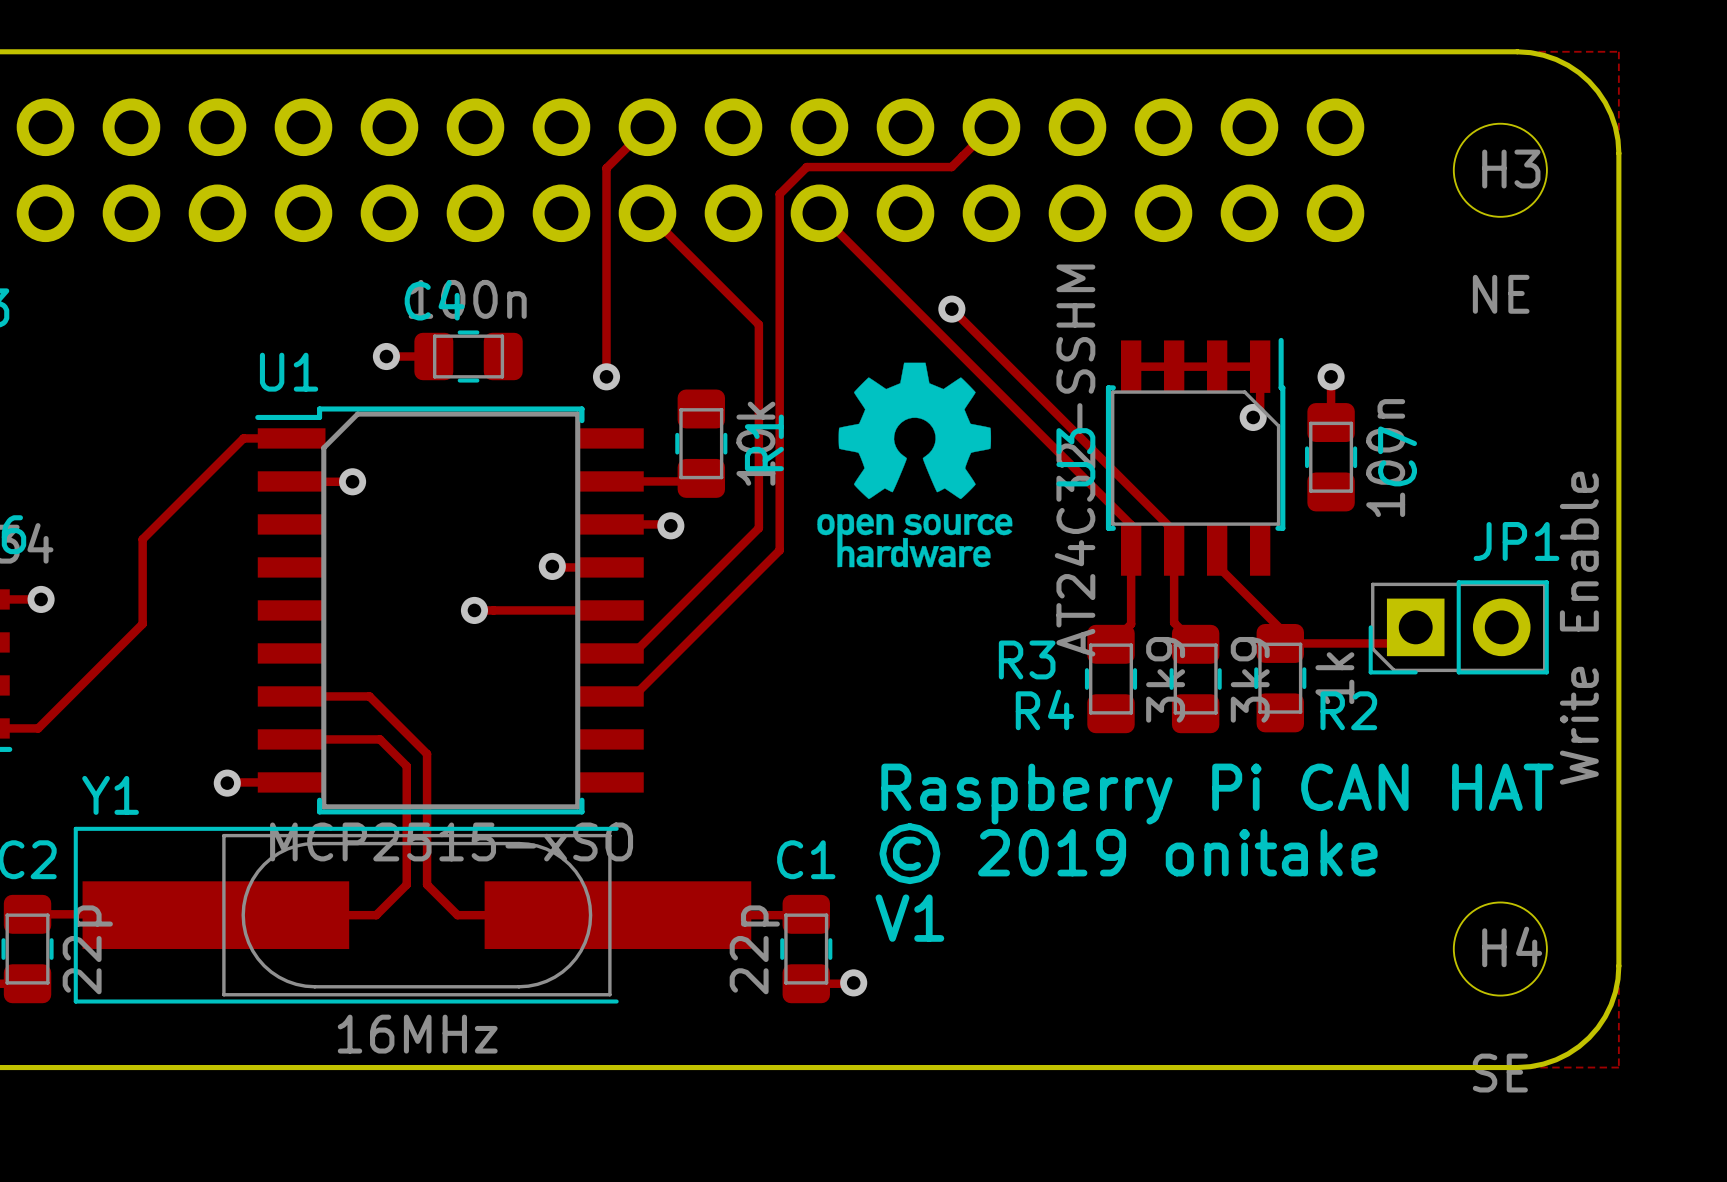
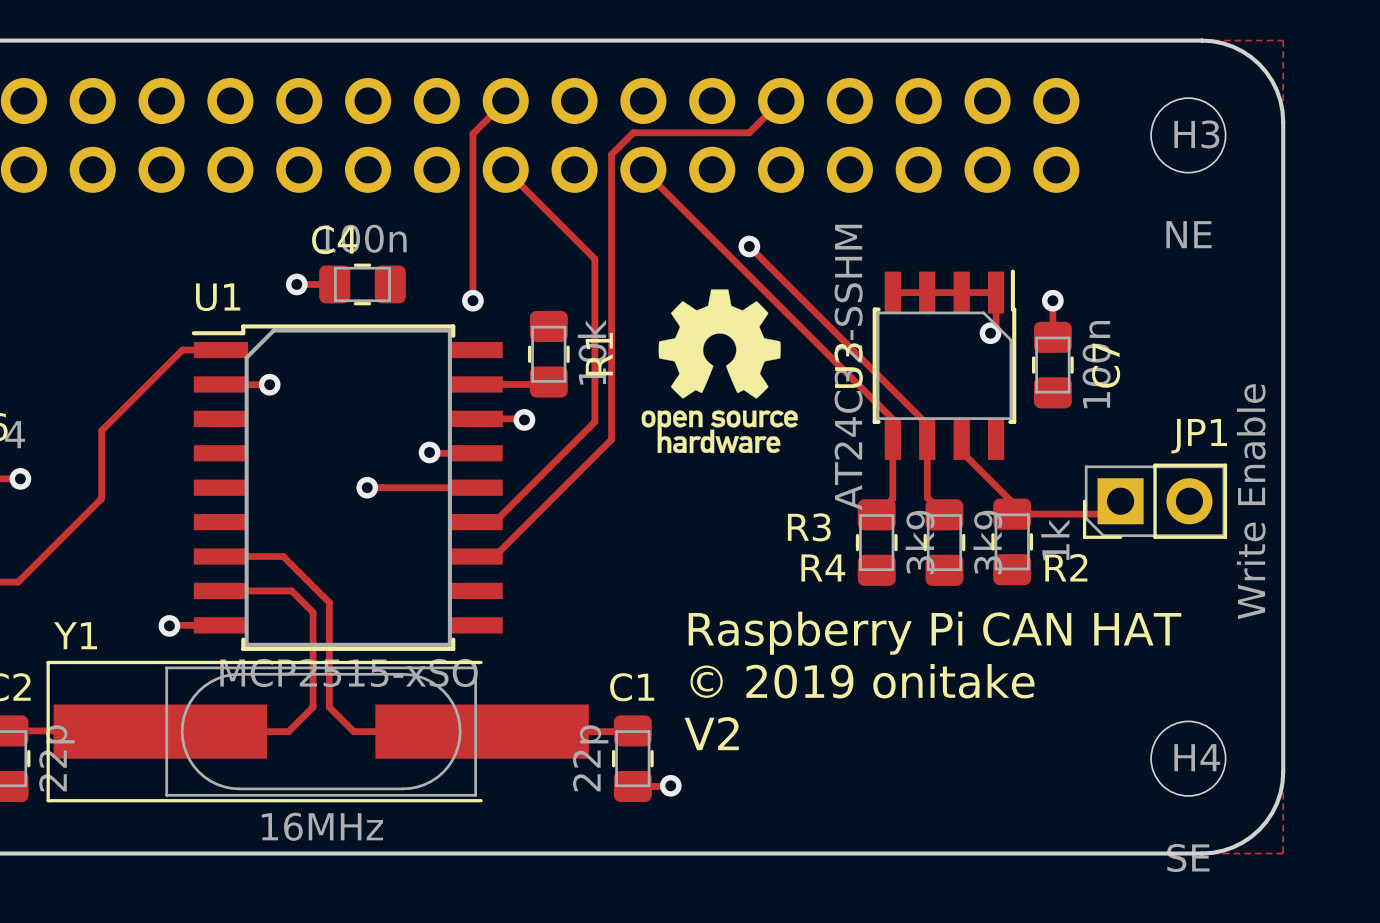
text: V1 (909, 918) -> V2 (711, 733)

